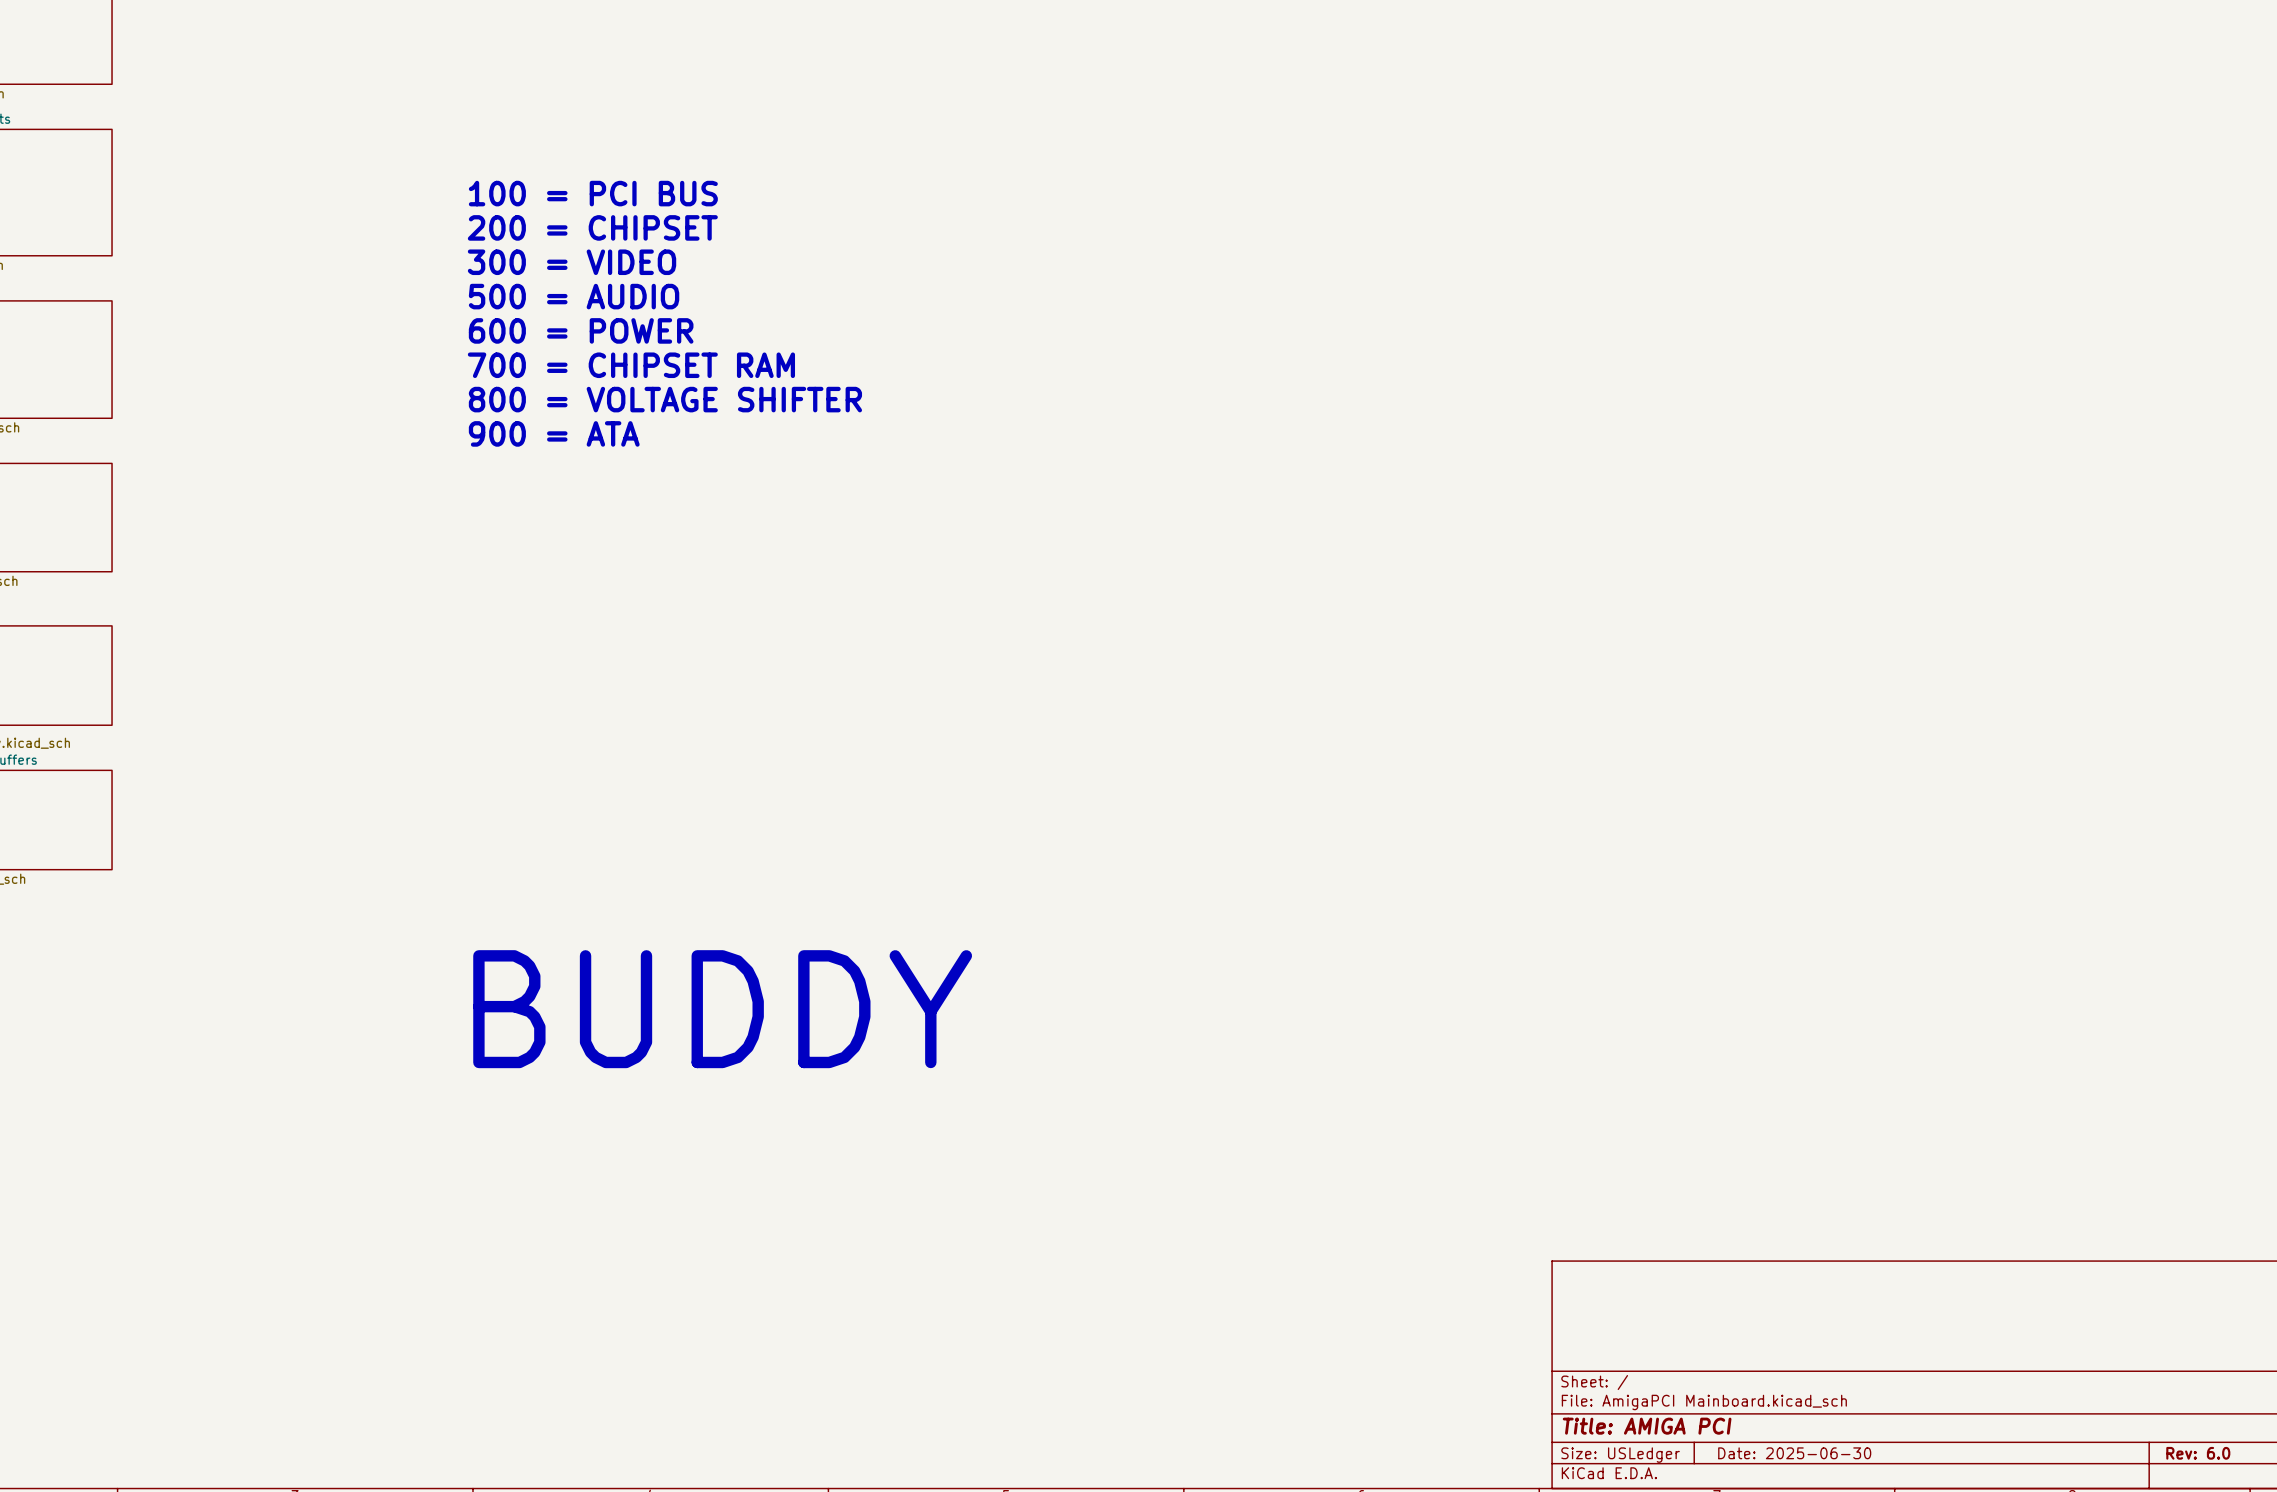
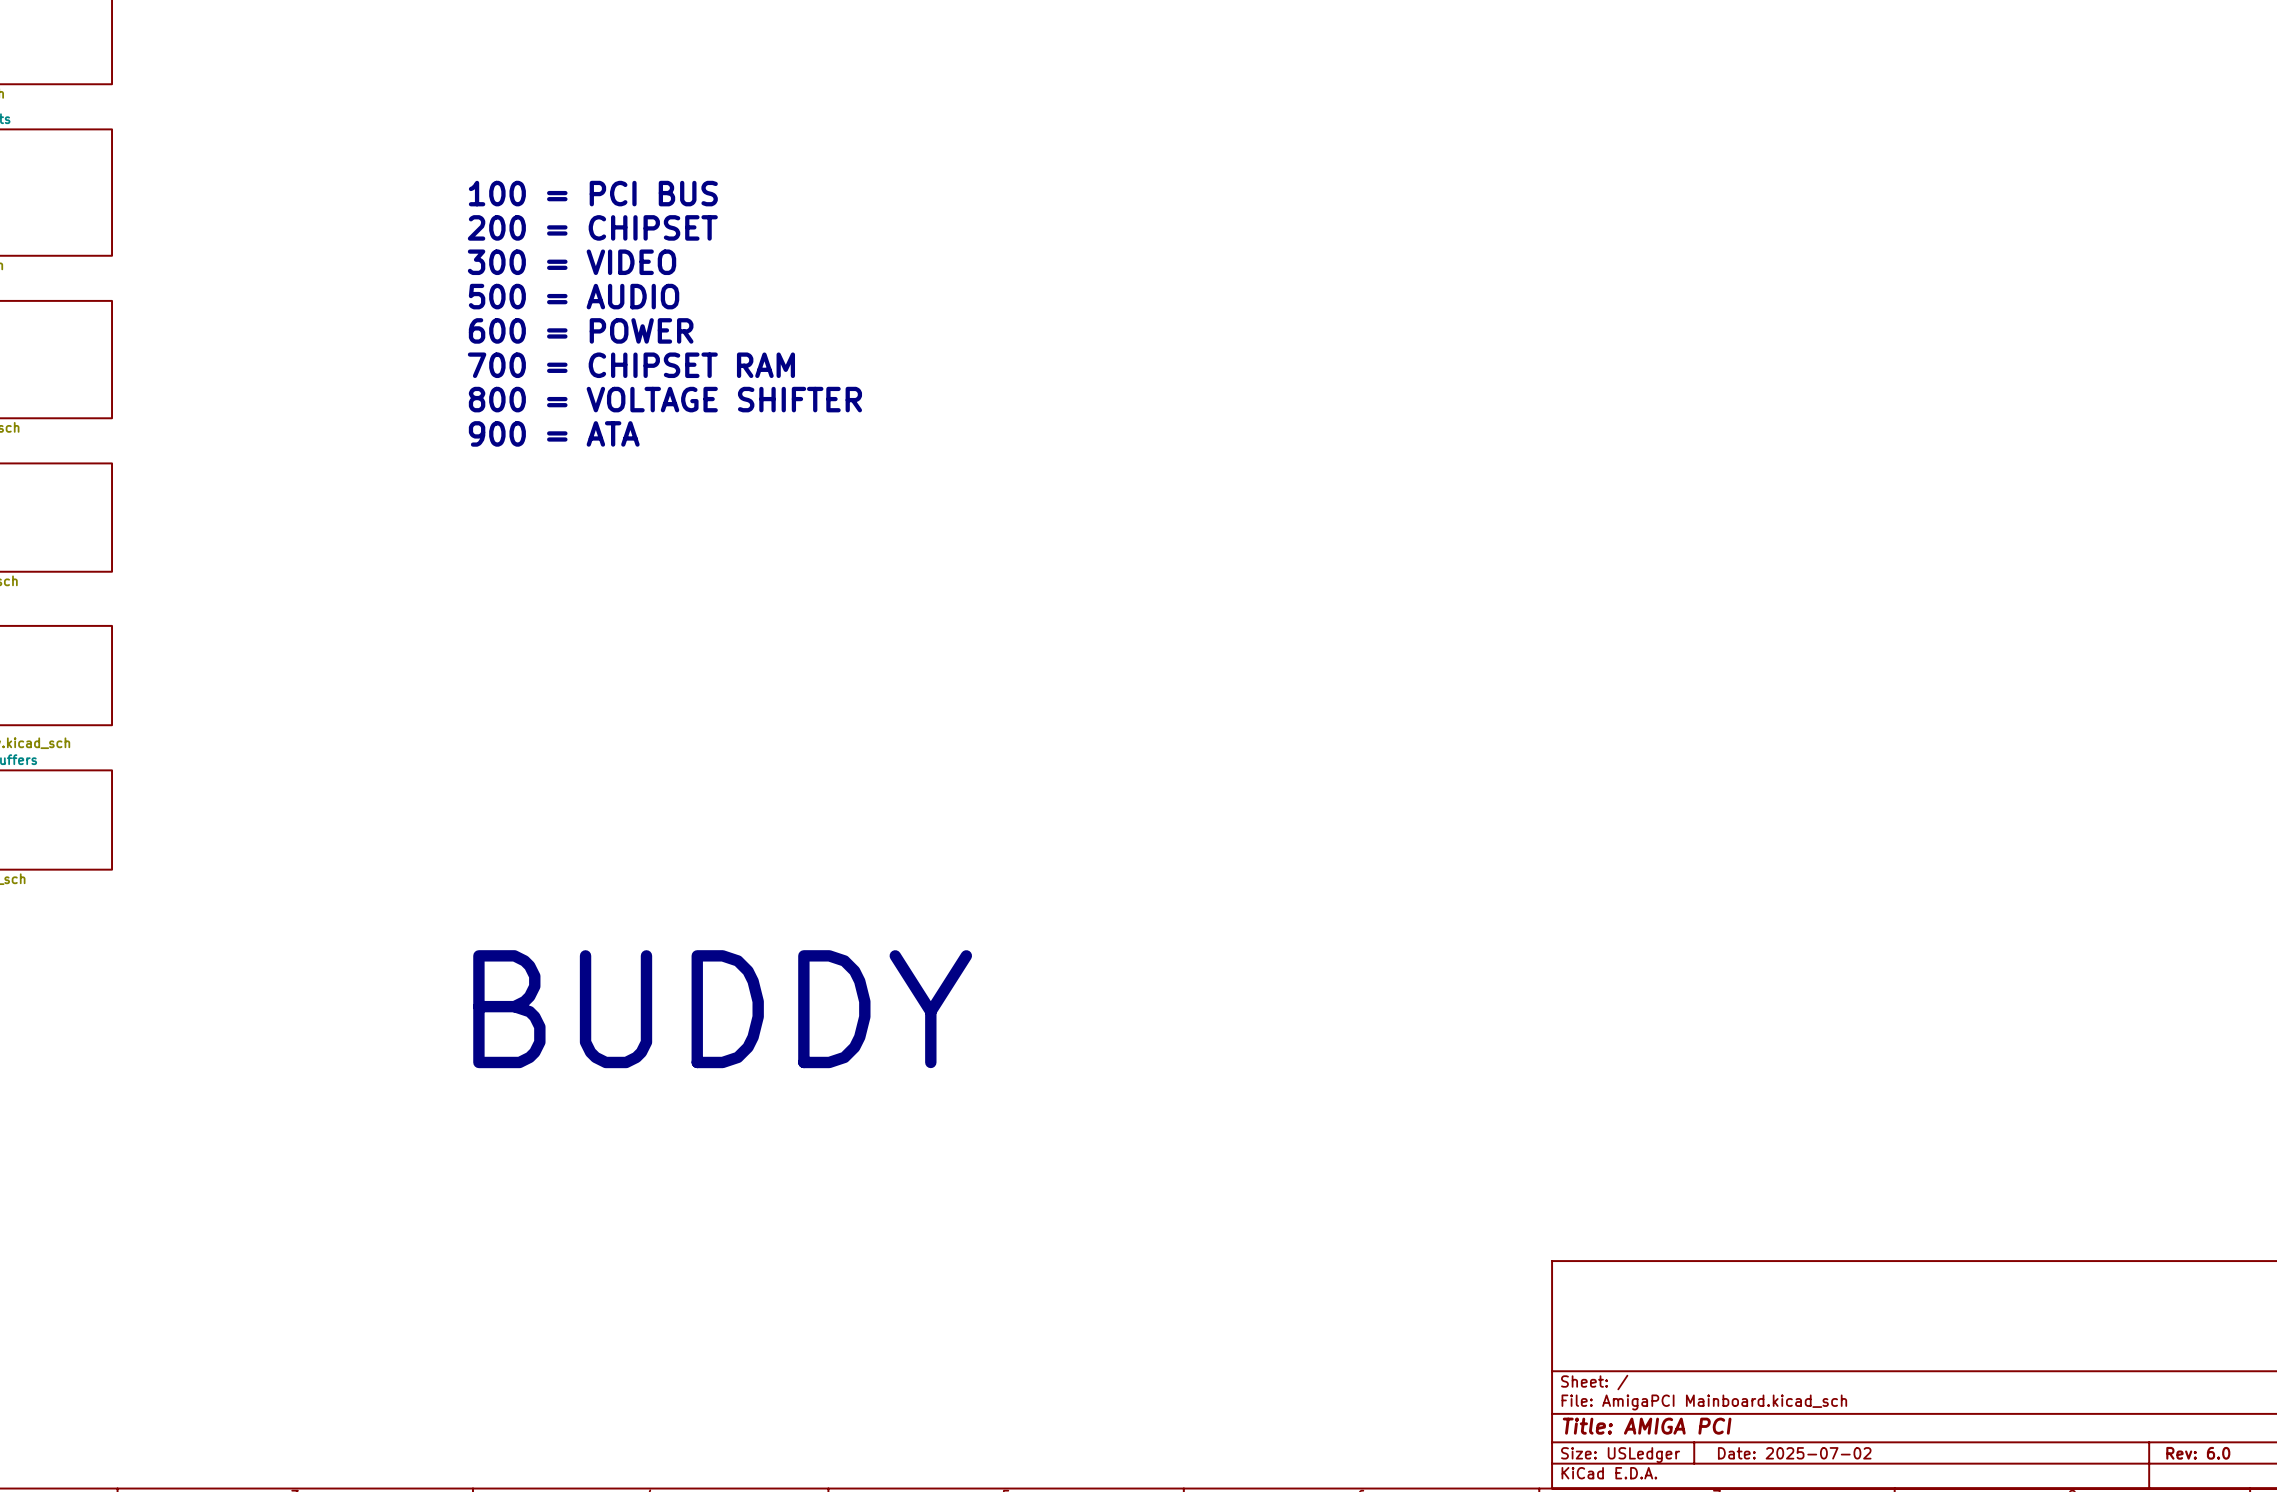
title block: Date: 2025-06-30 (1794, 1453) -> Date: 2025-07-02 (1794, 1453)

